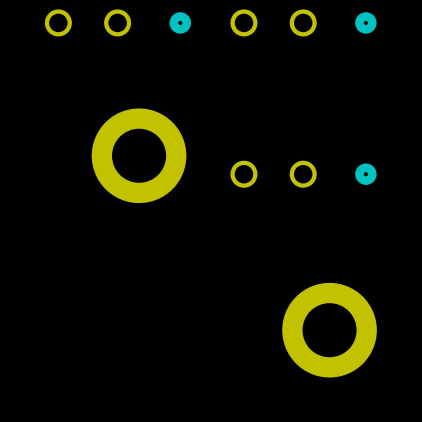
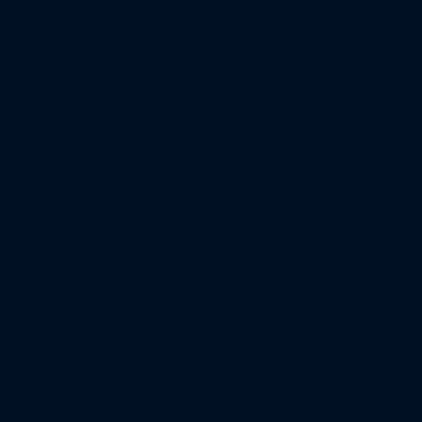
part: (117, 22) -> none
part: (303, 22) -> none
part: (139, 155) -> none
part: (303, 174) -> none
part: (329, 330) -> none

